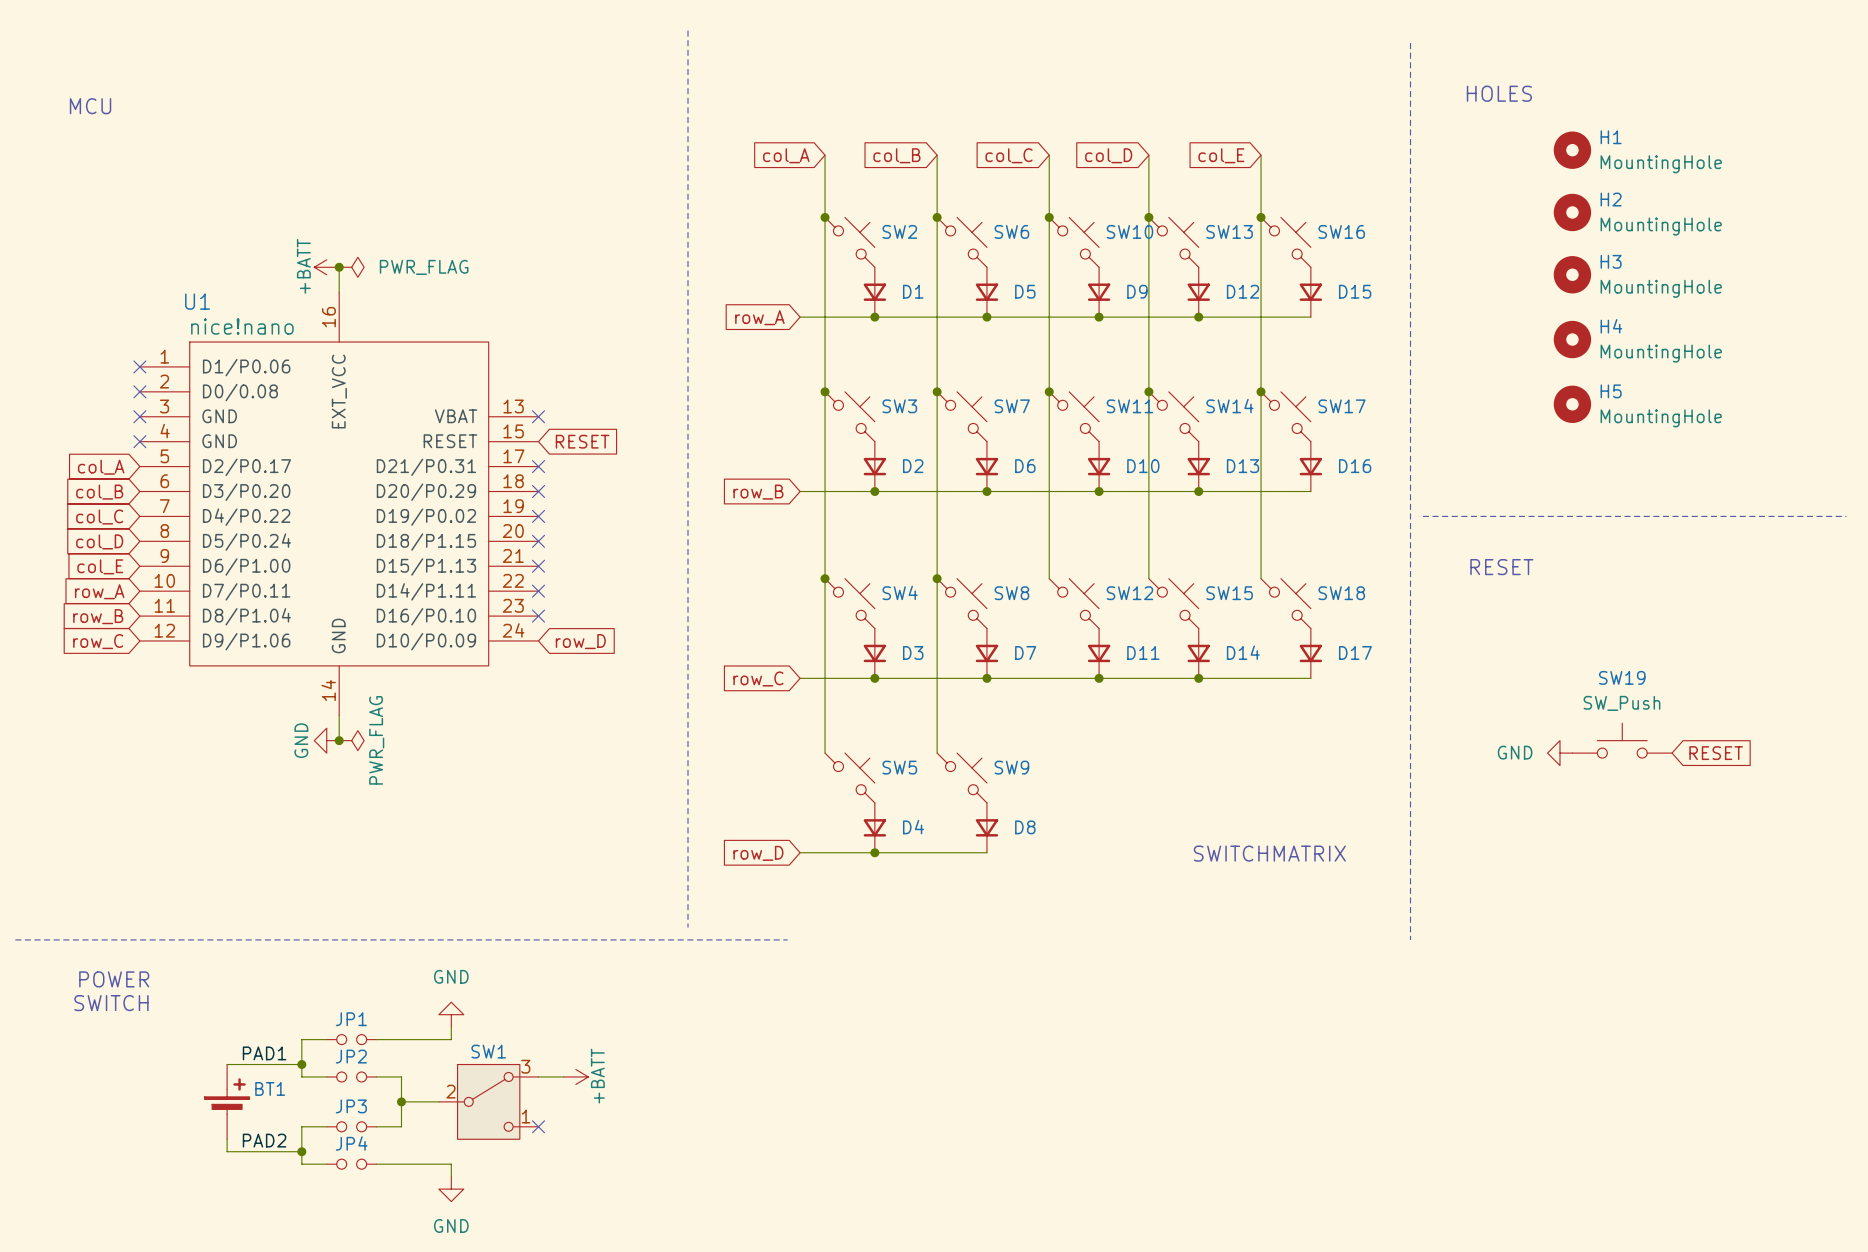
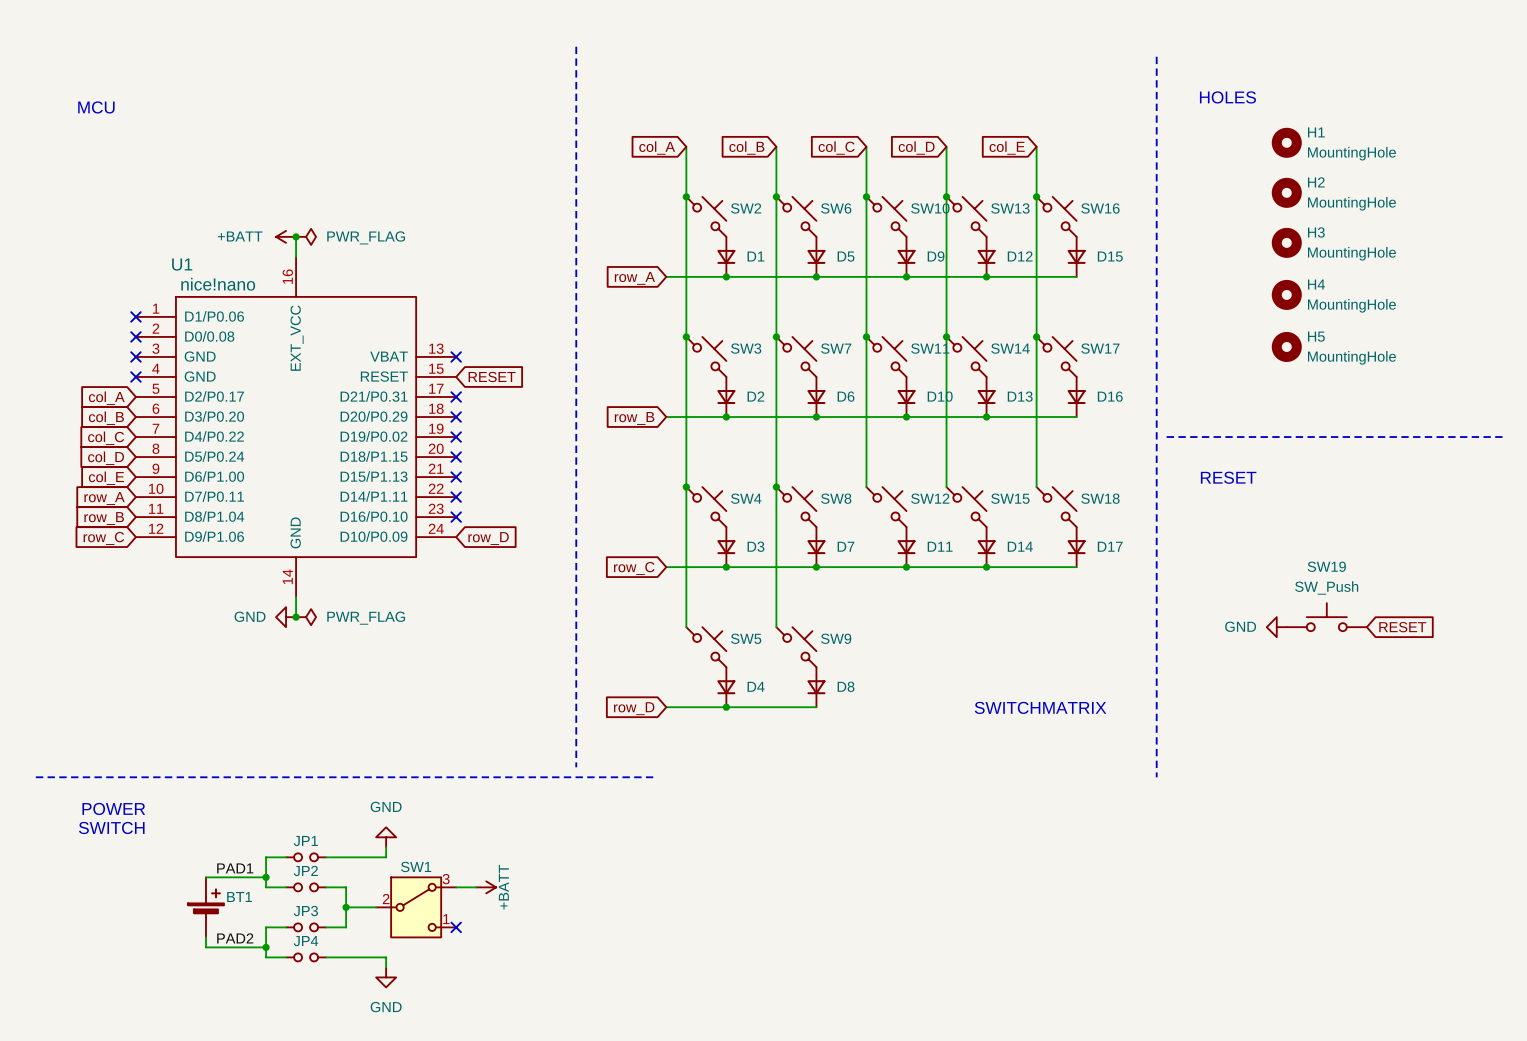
power symbol text rotation: 0° (303, 266) -> 90° clockwise (240, 236)
power symbol text rotation: 0° (301, 740) -> 90° clockwise (250, 616)
power symbol text rotation: 0° (376, 740) -> 90° clockwise (366, 618)

